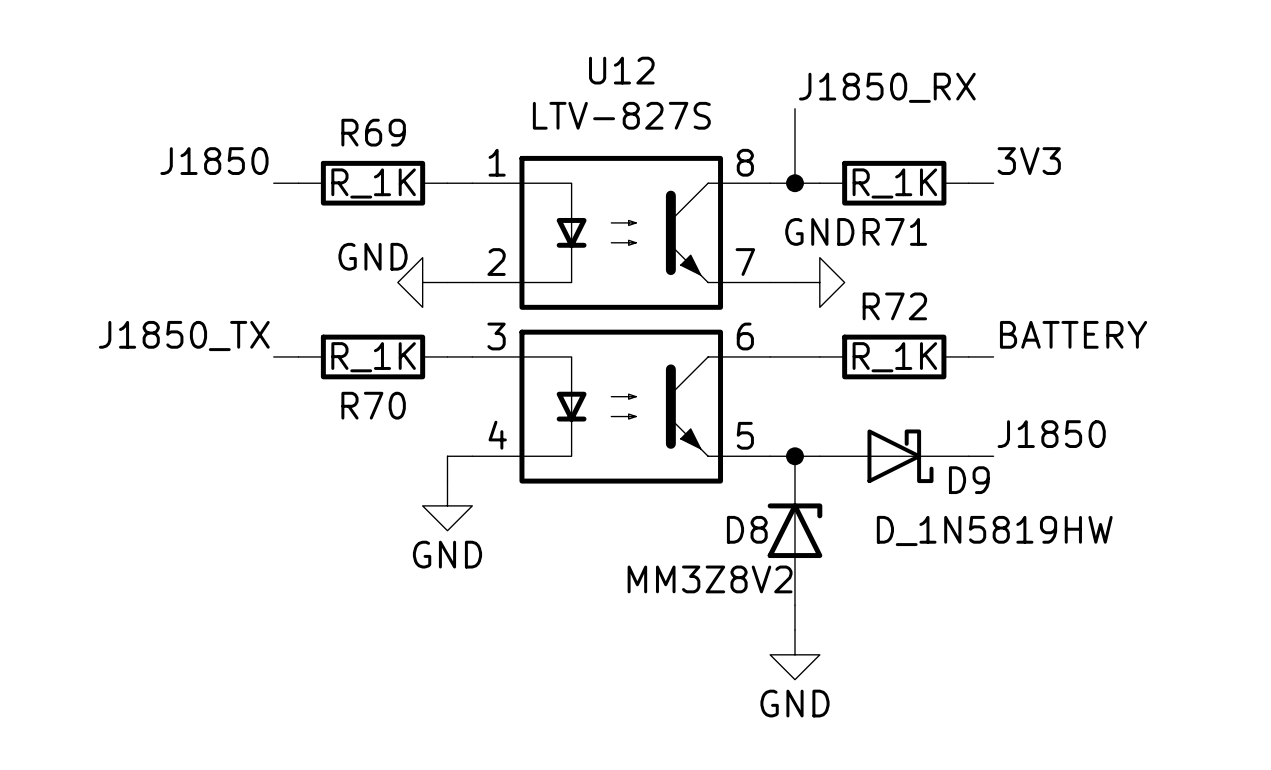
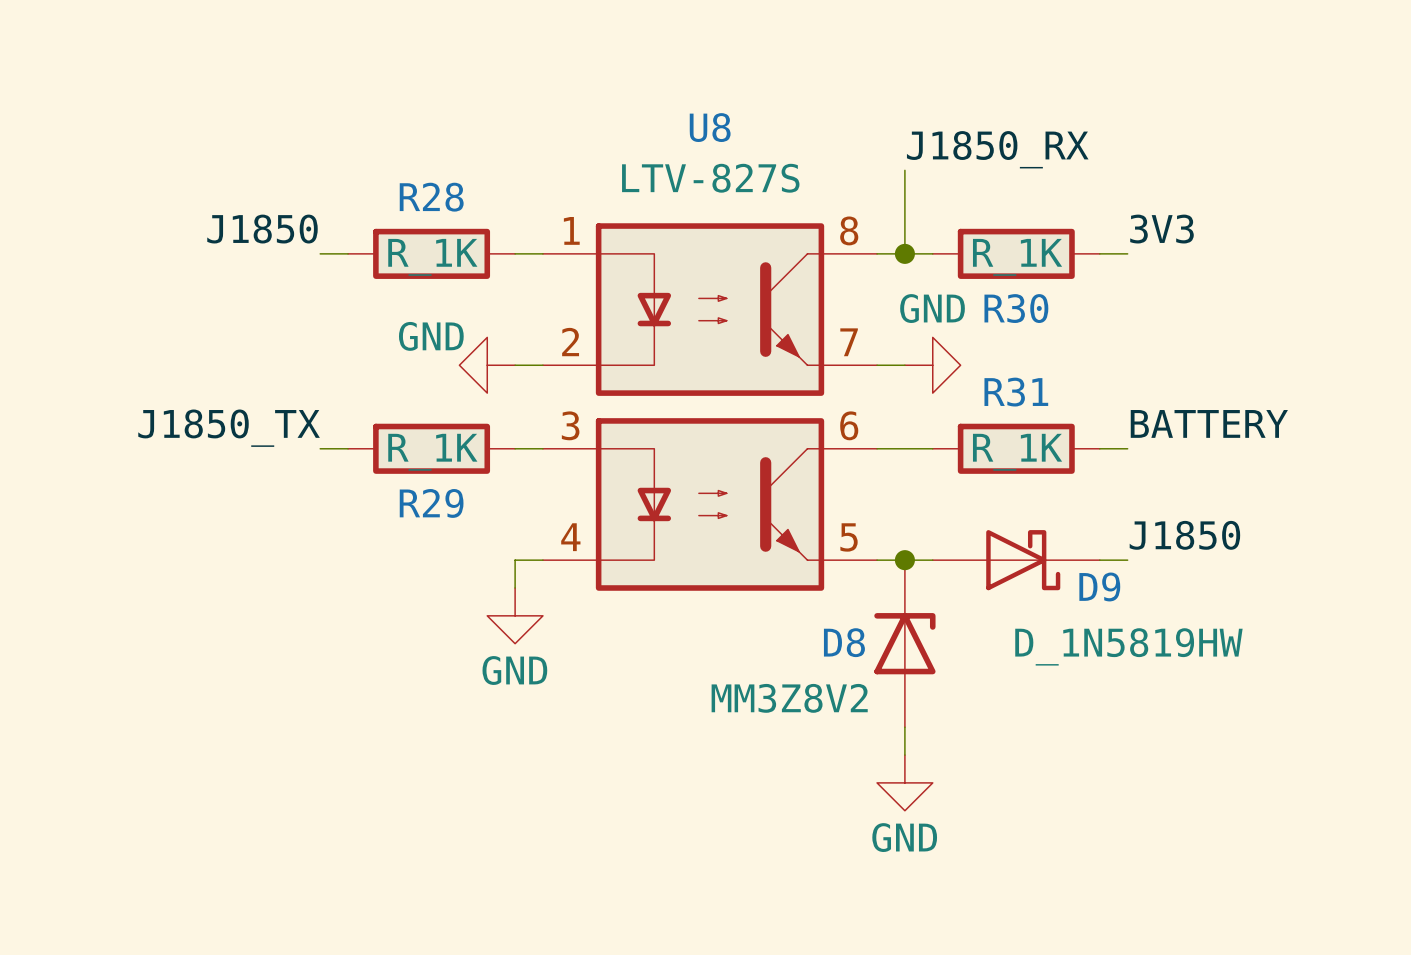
U12 name: U12 (621, 70) -> U8 (710, 127)
R69 name: R69 (373, 132) -> R28 (431, 197)
R71 name: R71 (894, 231) -> R30 (1016, 308)
R72 name: R72 (894, 306) -> R31 (1016, 392)
R70 name: R70 (373, 405) -> R29 (431, 503)

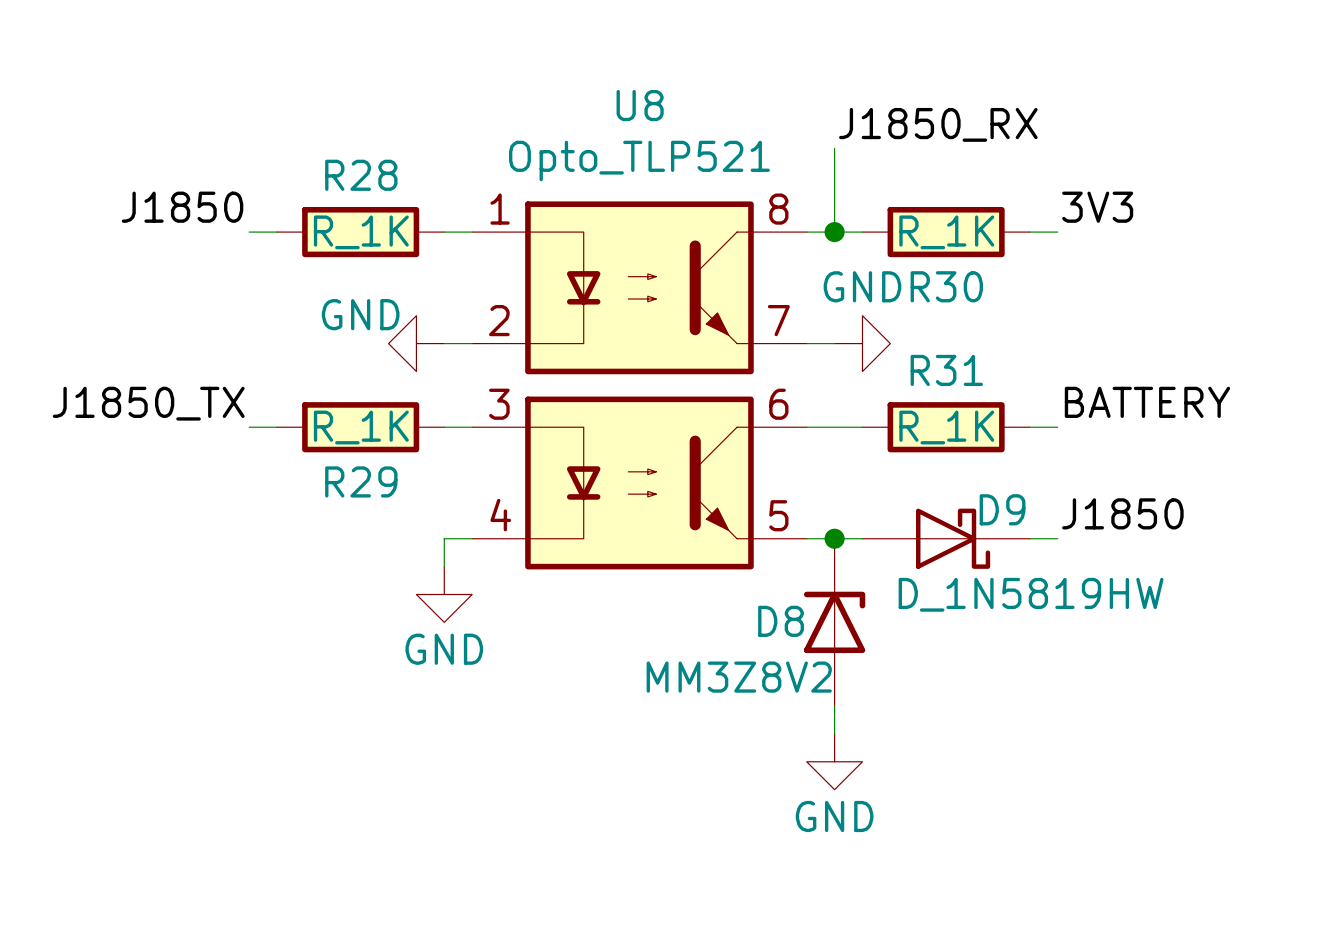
U8 value: LTV-827S (710, 178) -> Opto_TLP521 (639, 160)
D9 name position: D9 (1099, 586) -> D9 (1002, 509)
D9 value position: D_1N5819HW (1128, 646) -> D_1N5819HW (1031, 594)

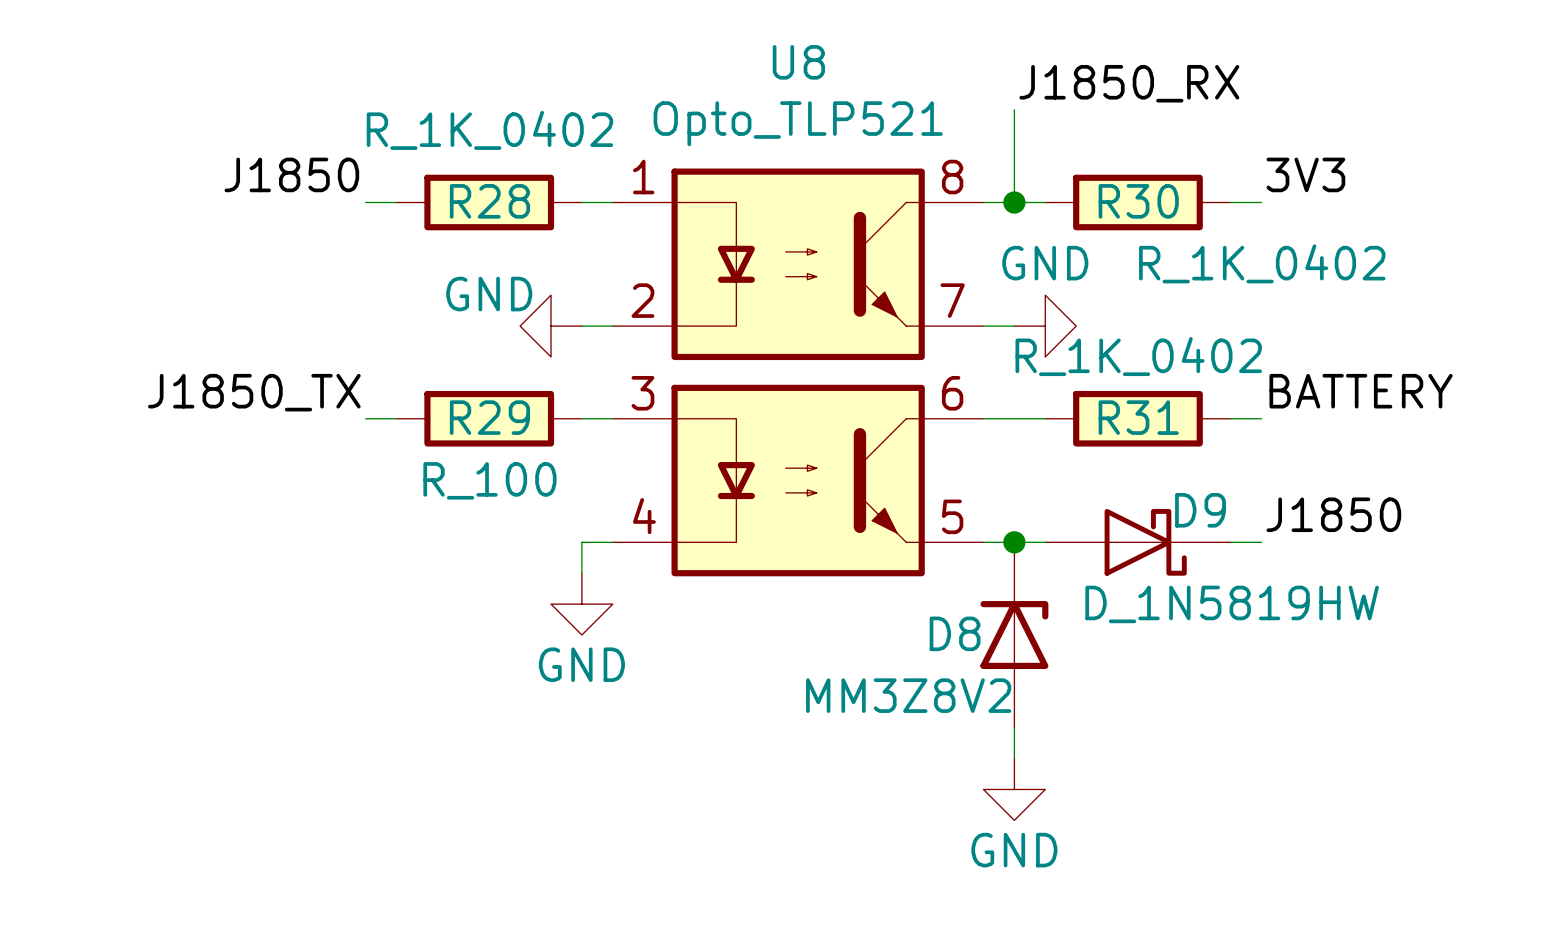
R28 name position: R28 (361, 175) -> R28 (489, 201)
R28 value: R_1K (361, 232) -> R_1K_0402 (489, 130)
R30 value: R_1K (946, 232) -> R_1K_0402 (1262, 263)
R30 name position: R30 (946, 286) -> R30 (1138, 201)
R31 name position: R31 (946, 370) -> R31 (1138, 417)
R29 value: R_1K (361, 427) -> R_100 (489, 480)
R31 value: R_1K (946, 427) -> R_1K_0402 (1138, 356)
R29 name position: R29 (361, 481) -> R29 (489, 417)

